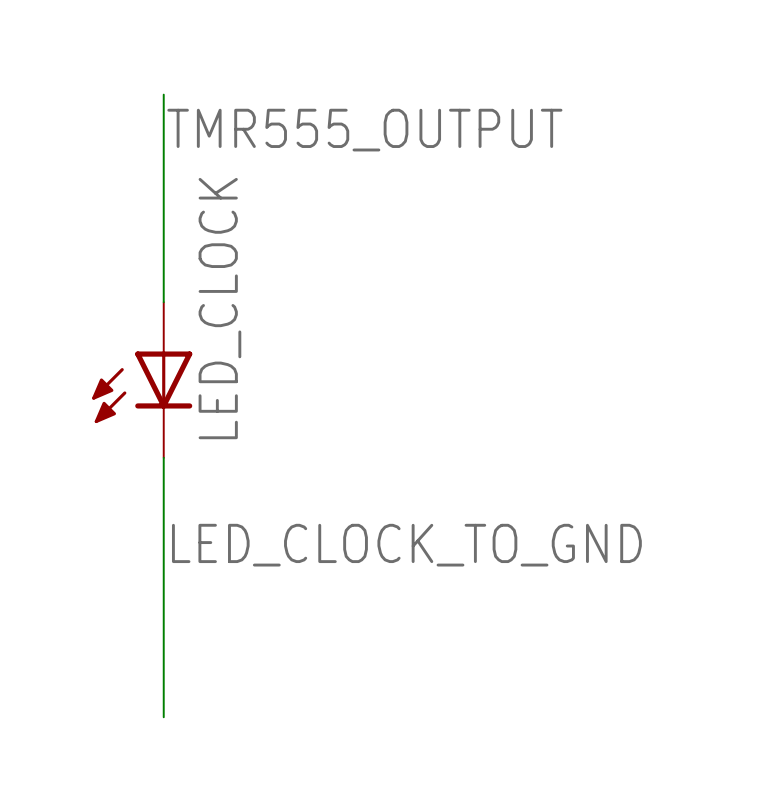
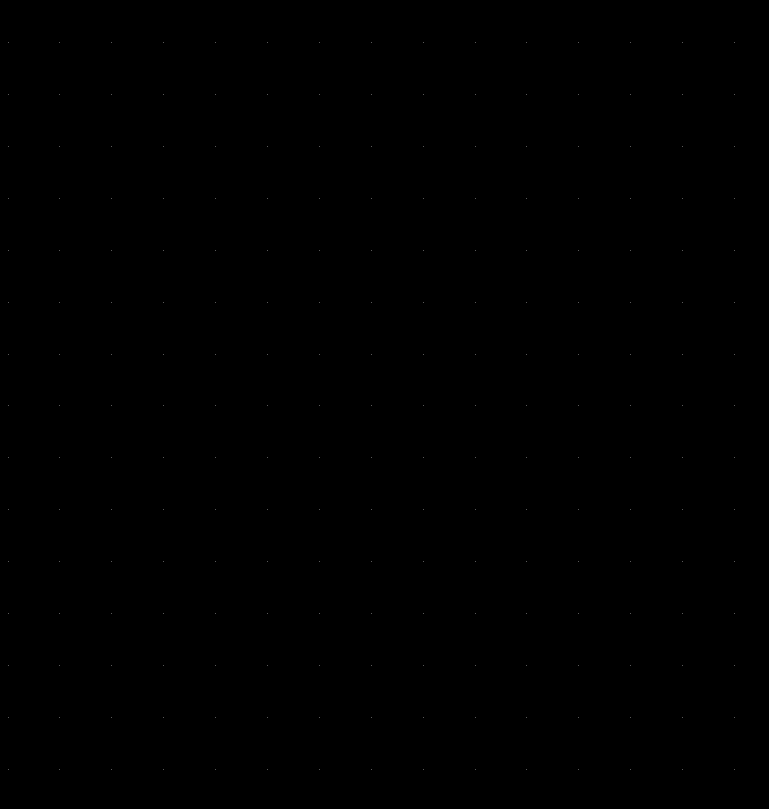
wire: (163, 94) (163, 302) -> none
label: TMR555_OUTPUT (364, 130) -> none
LED_CLOCK: (142, 380) -> none
wire: (163, 457) (163, 717) -> none
label: LED_CLOCK_TO_GND (406, 545) -> none

